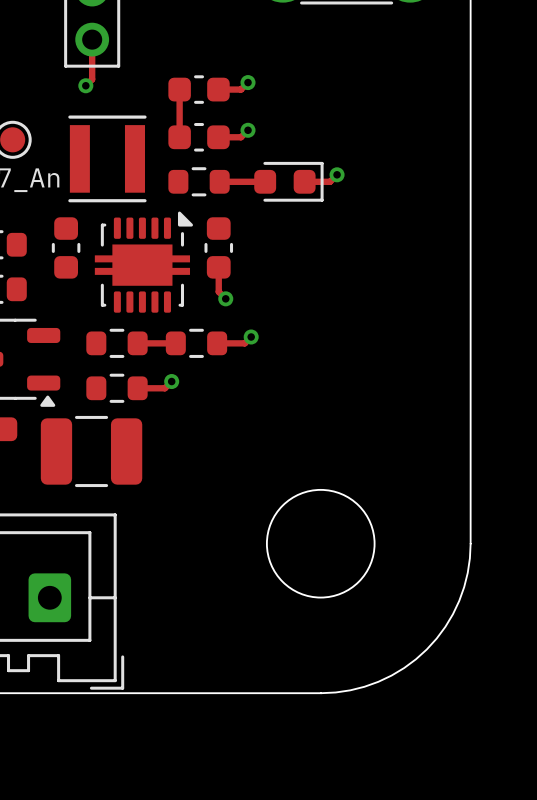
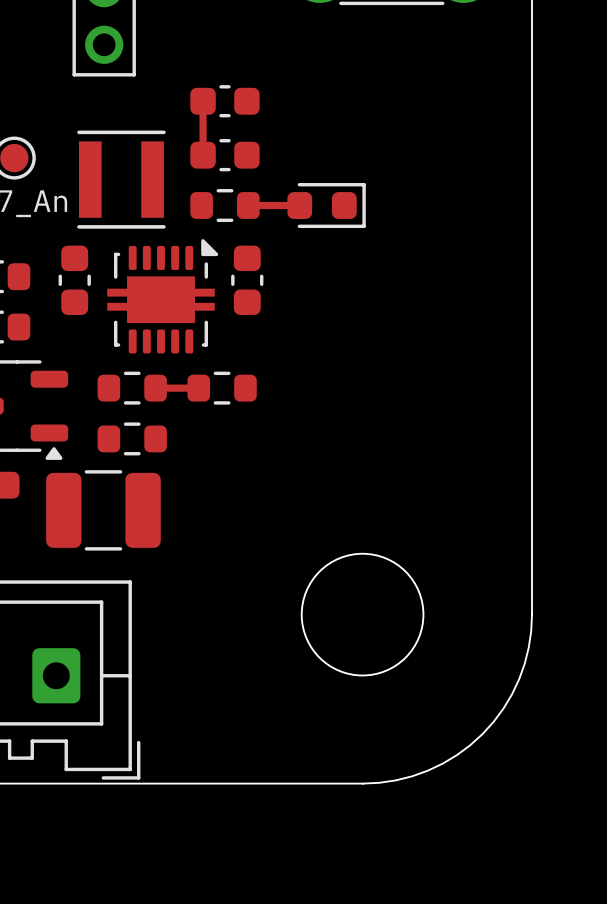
top track: (92, 39) (92, 79) (85, 85) -> none
top track: (248, 82) (241, 89) (218, 89) -> none
via: (248, 82) -> none
via: (85, 85) -> none
top track: (248, 130) (241, 137) (218, 137) -> none
via: (248, 130) -> none
top track: (337, 174) (330, 181) (304, 181) -> none
via: (337, 174) -> none
top track: (218, 267) (218, 291) (225, 298) -> none
via: (225, 298) -> none
top track: (251, 337) (244, 343) (217, 343) -> none
via: (251, 337) -> none
top track: (171, 381) (164, 388) (137, 388) -> none
via: (171, 381) -> none

